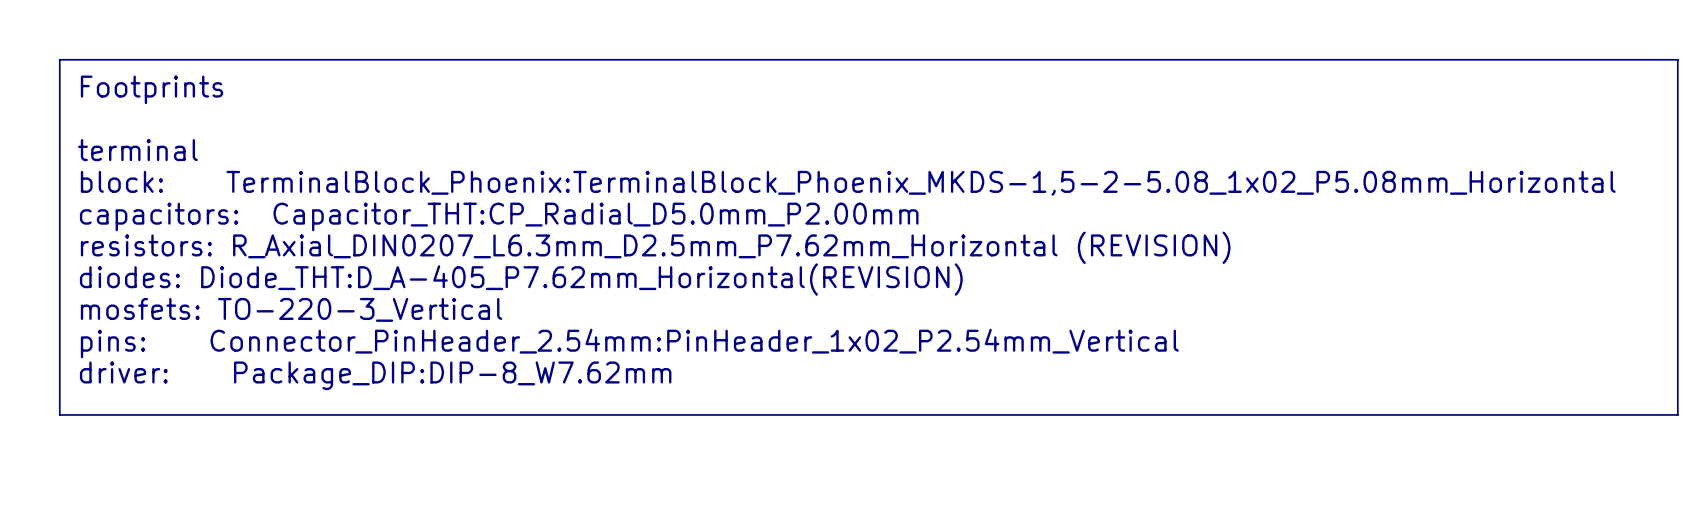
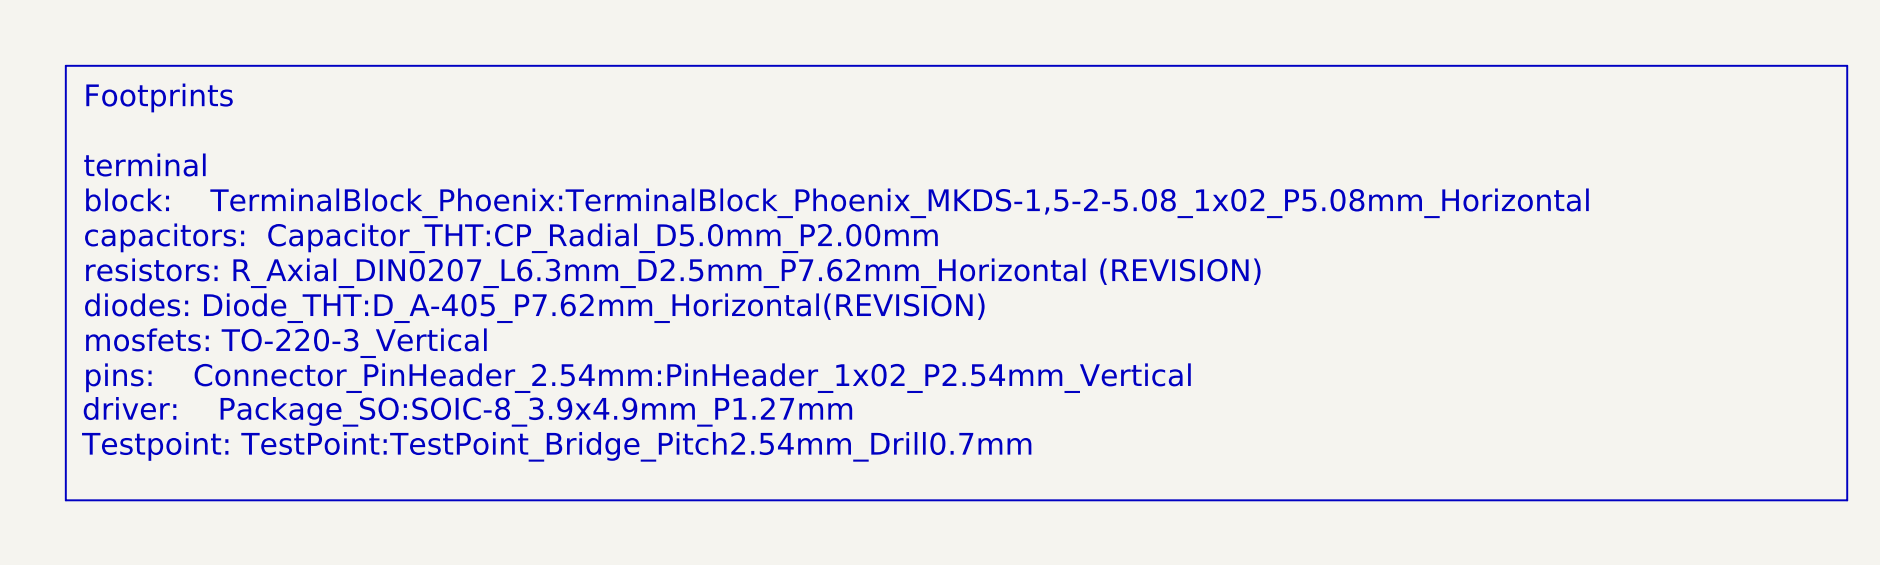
text: driver: Package_DIP:DIP-8_W7.62mm (375, 375) -> driver: Package_SO:SOIC-8_3.9x4.9mm_P1.27mm (467, 411)
text: none -> Testpoint: TestPoint:TestPoint_Bridge_Pitch2.54mm_Drill0.7mm (556, 446)
line: (59, 414) (1677, 414) -> (65, 456) (65, 500) (1847, 500) (1847, 456)

